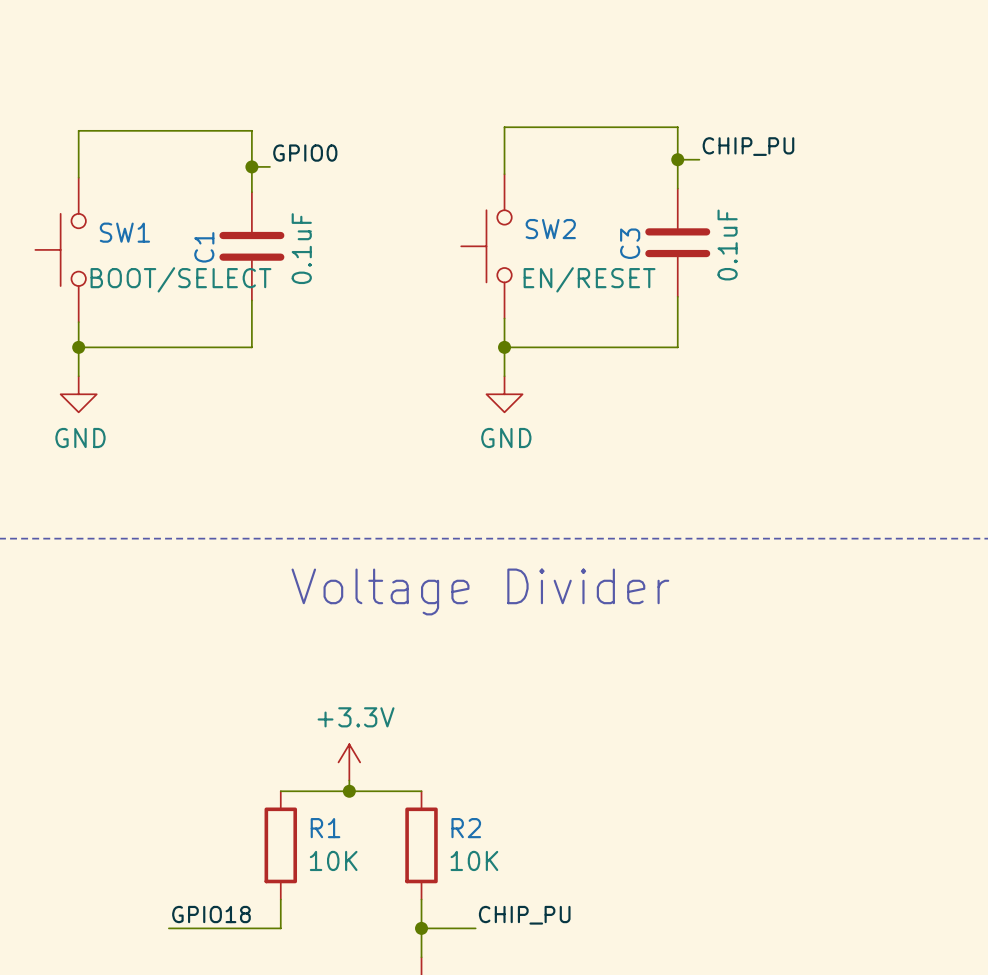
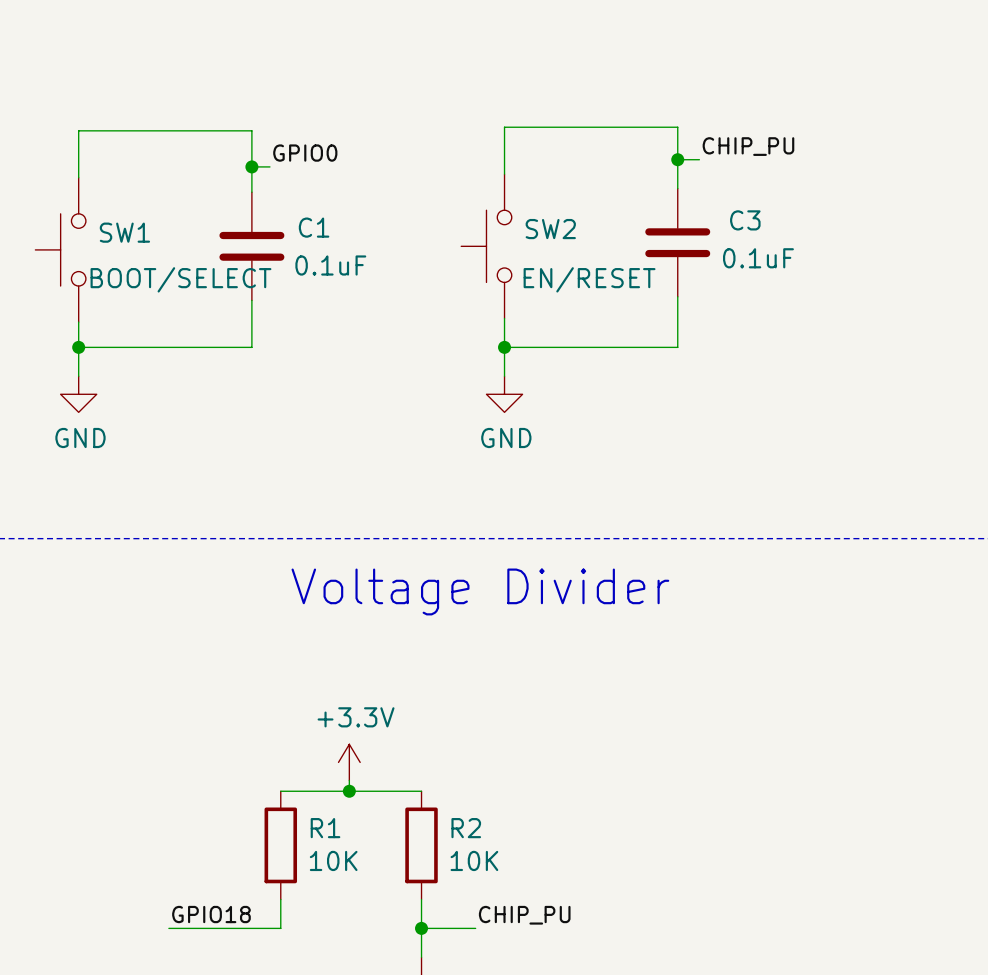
C3 name rotation: 0° (630, 243) -> 90° clockwise (745, 220)
C3 name position: C3 (630, 243) -> C3 (745, 220)
C3 value rotation: 0° (727, 245) -> 90° clockwise (758, 258)
C1 name rotation: 0° (204, 247) -> 90° clockwise (314, 227)
C1 name position: C1 (204, 247) -> C1 (314, 227)
C1 value rotation: 0° (301, 248) -> 90° clockwise (330, 265)

